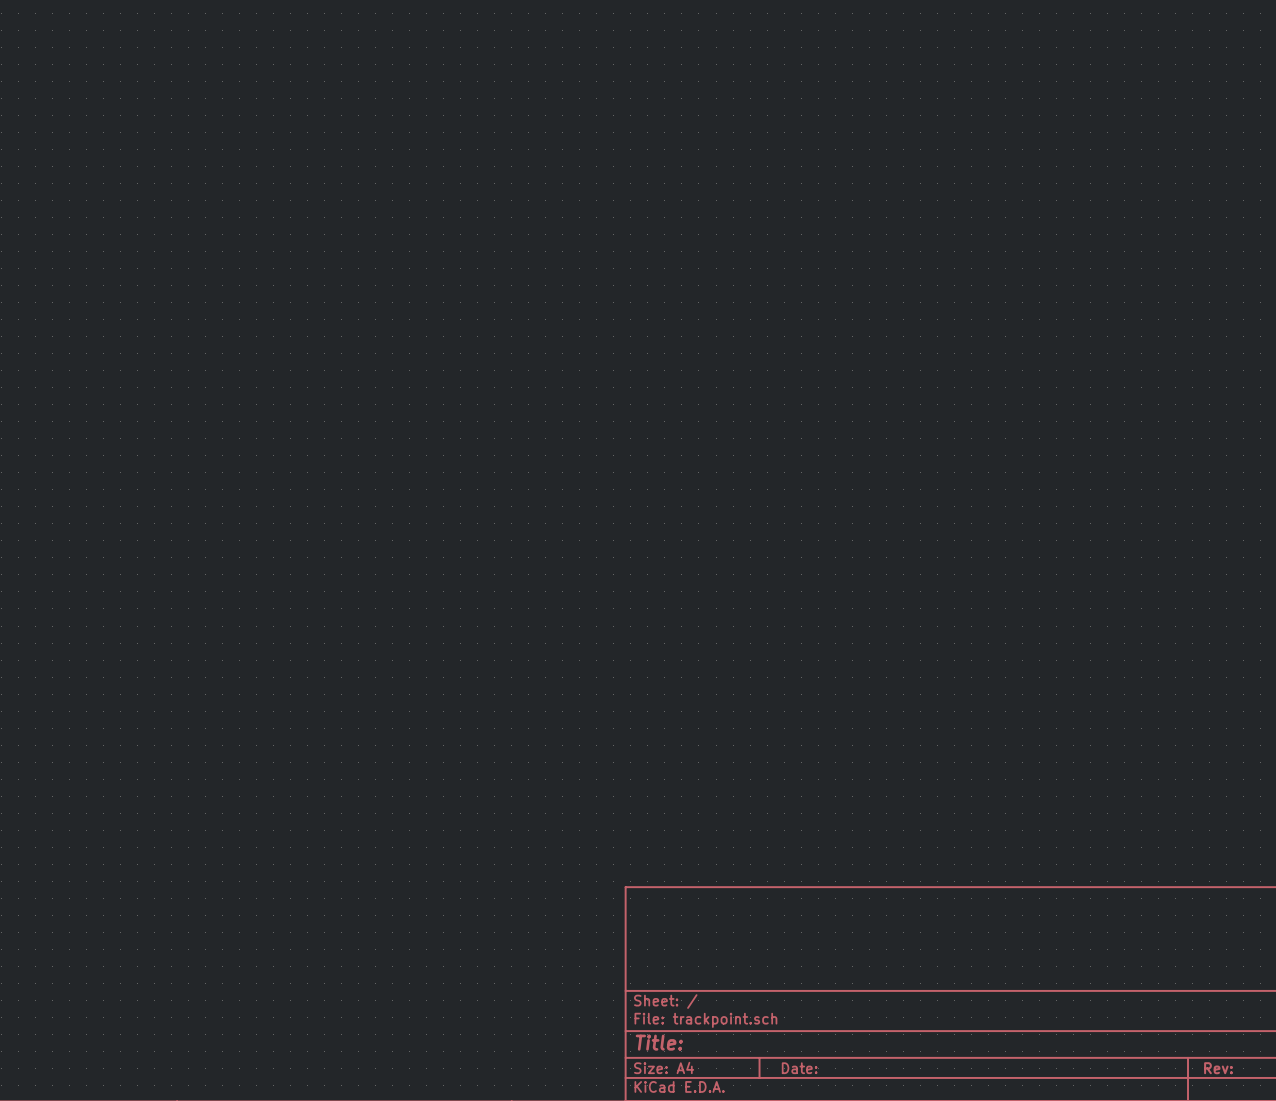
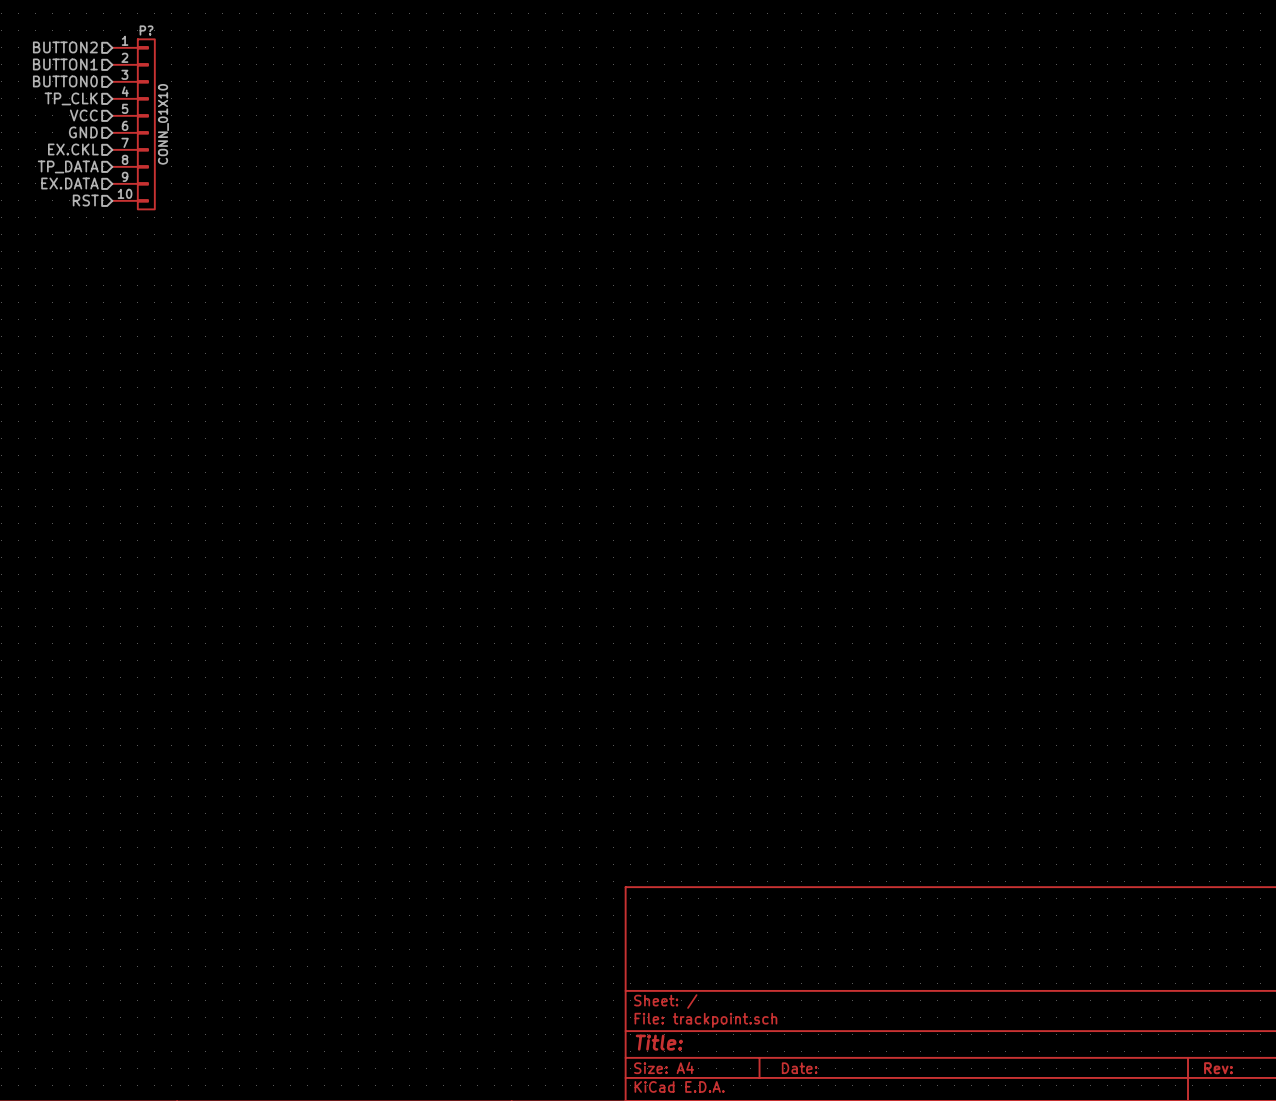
hierarchical label: none -> BUTTON2 (65, 47)
hierarchical label: none -> BUTTON1 (65, 64)
hierarchical label: none -> BUTTON0 (65, 81)
hierarchical label: none -> TP_CLK (71, 98)
hierarchical label: none -> VCC (83, 115)
P?: none -> CONN_01X10 (133, 124)
hierarchical label: none -> GND (83, 132)
hierarchical label: none -> EX.CKL (73, 149)
hierarchical label: none -> TP_DATA (68, 166)
hierarchical label: none -> EX.DATA (69, 183)
hierarchical label: none -> RST (85, 200)

